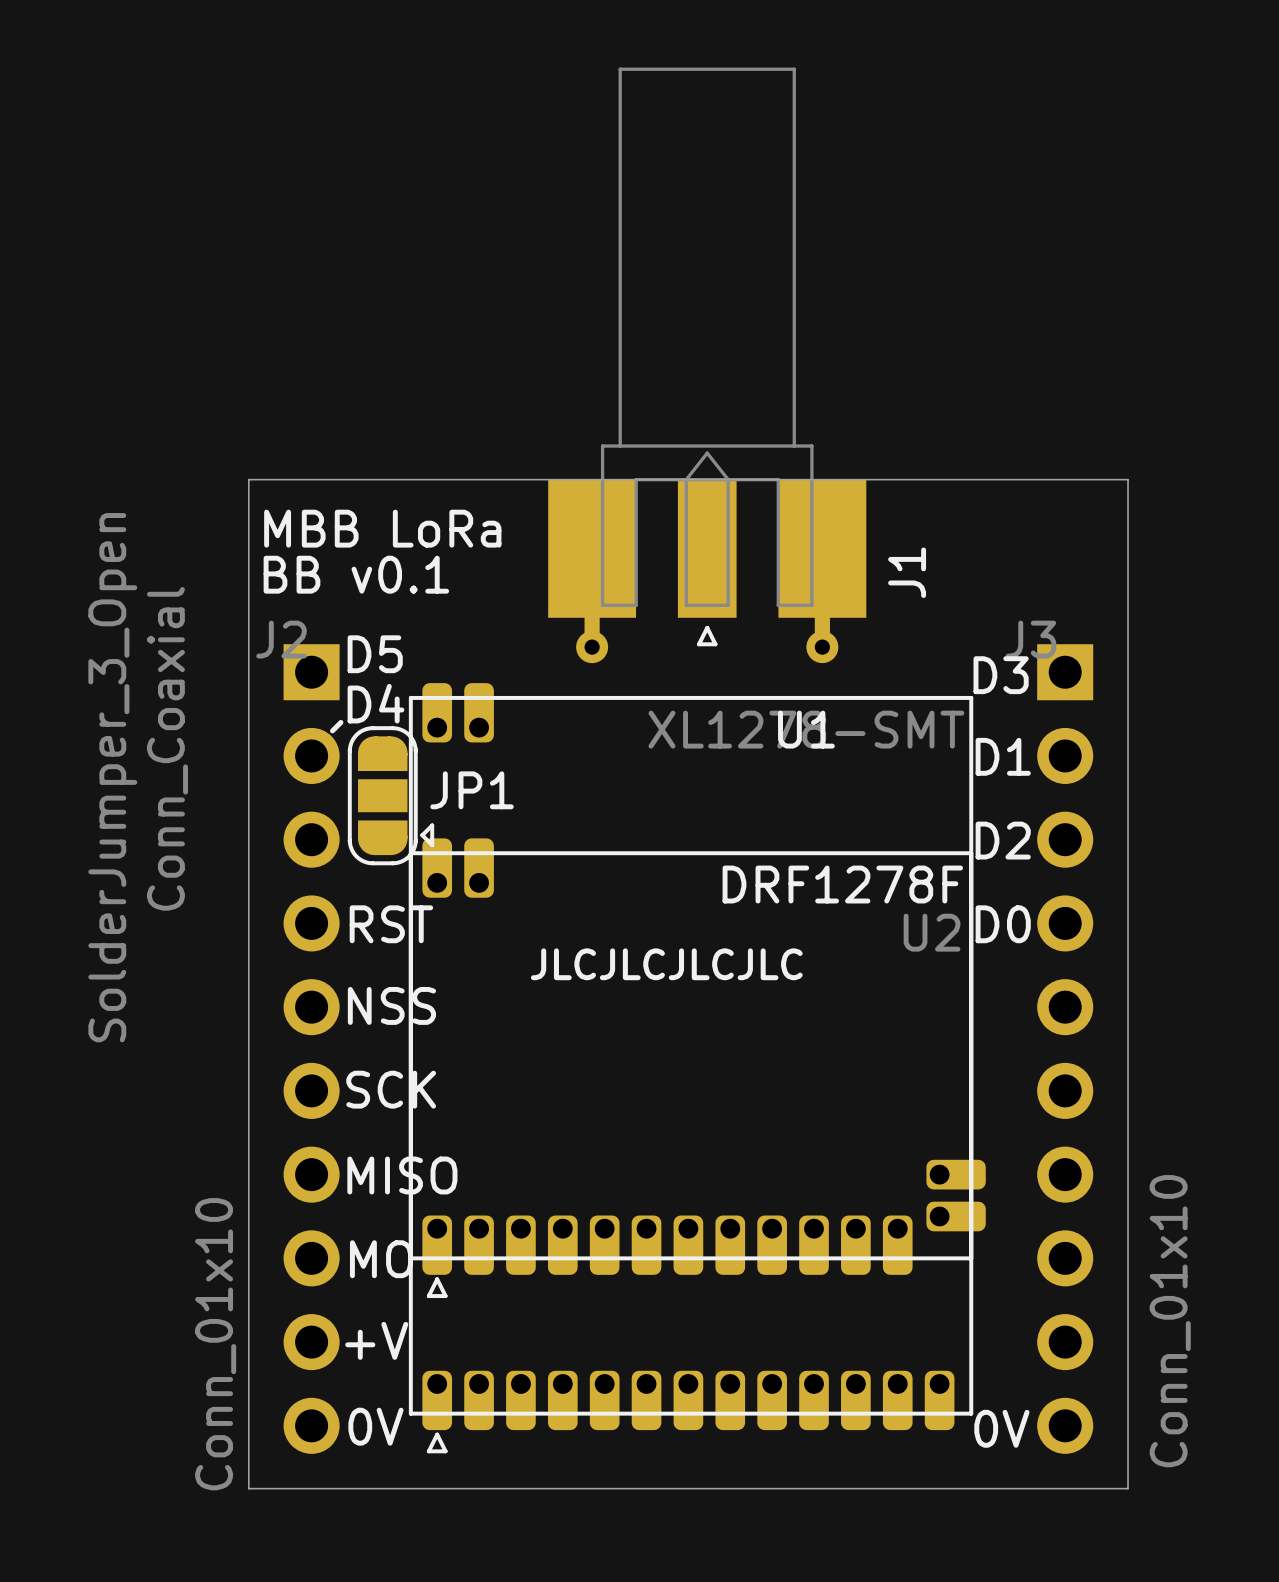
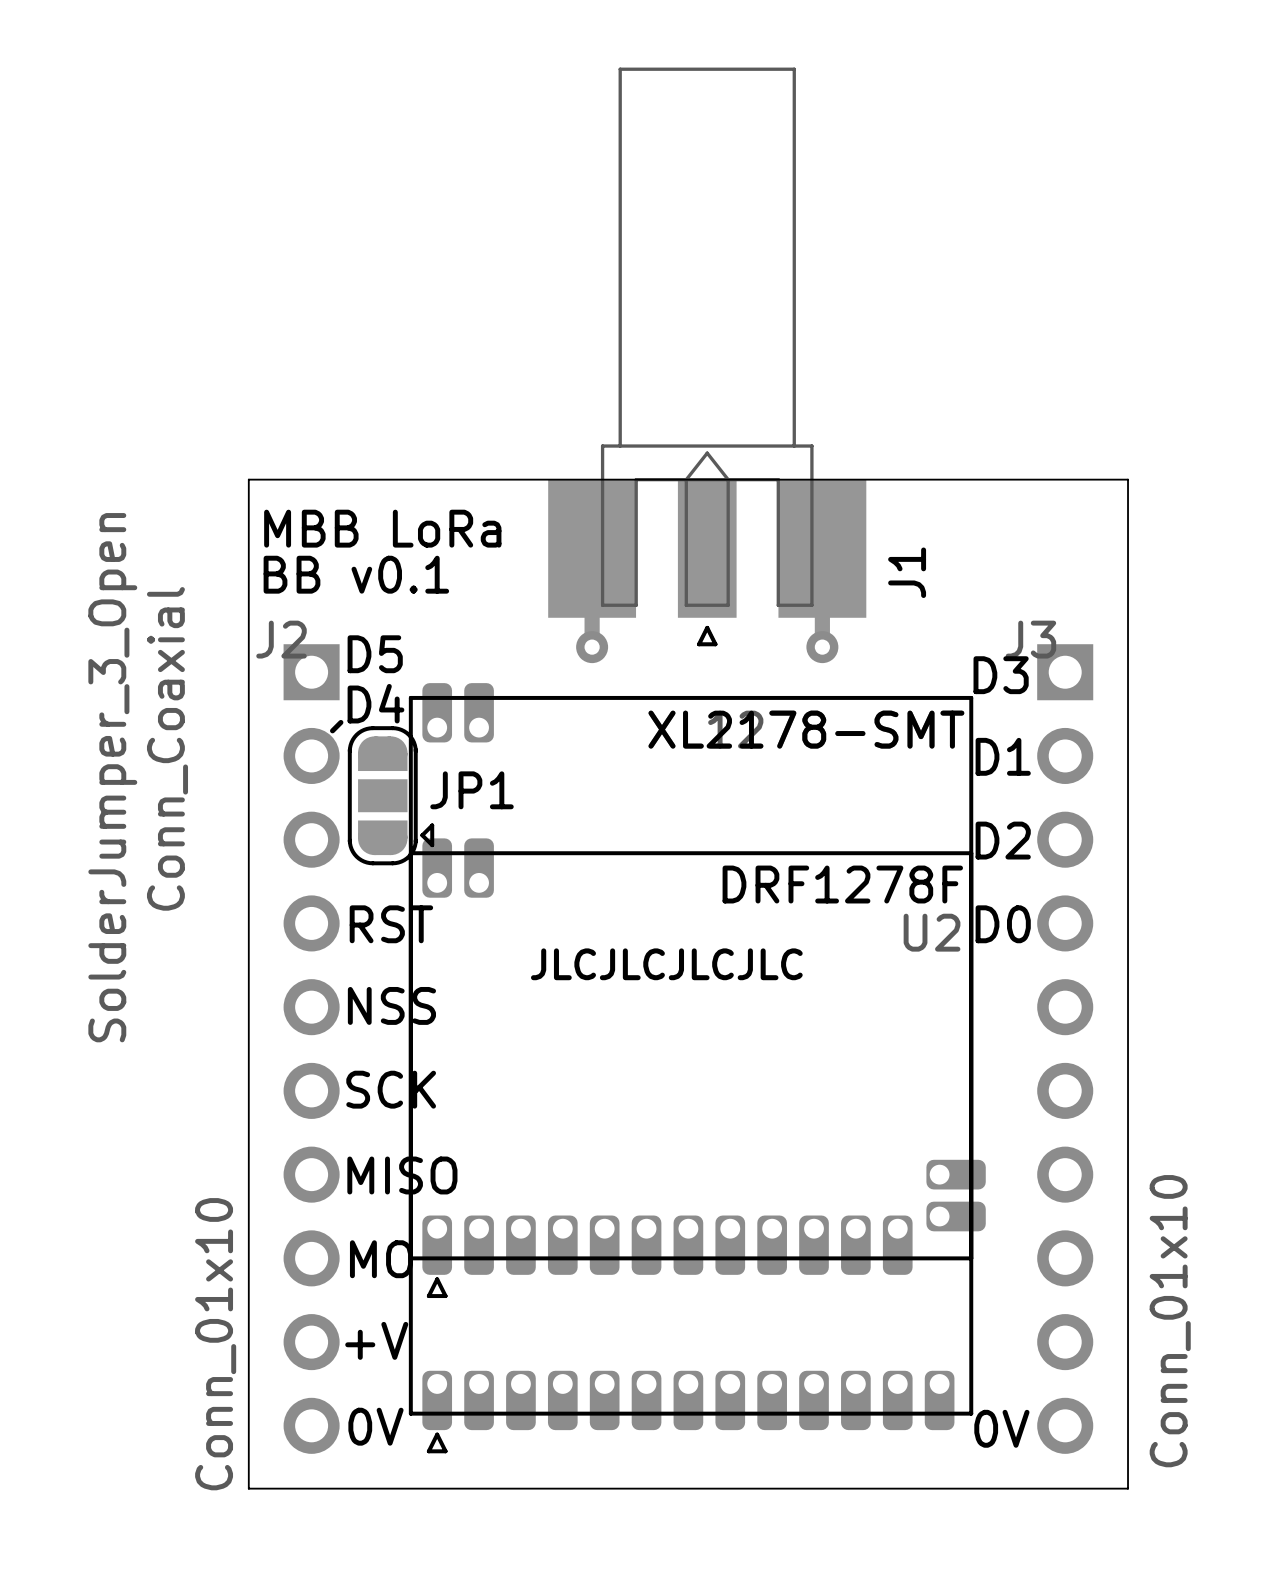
U1 name: U1 (806, 729) -> XL2178-SMT (806, 729)

